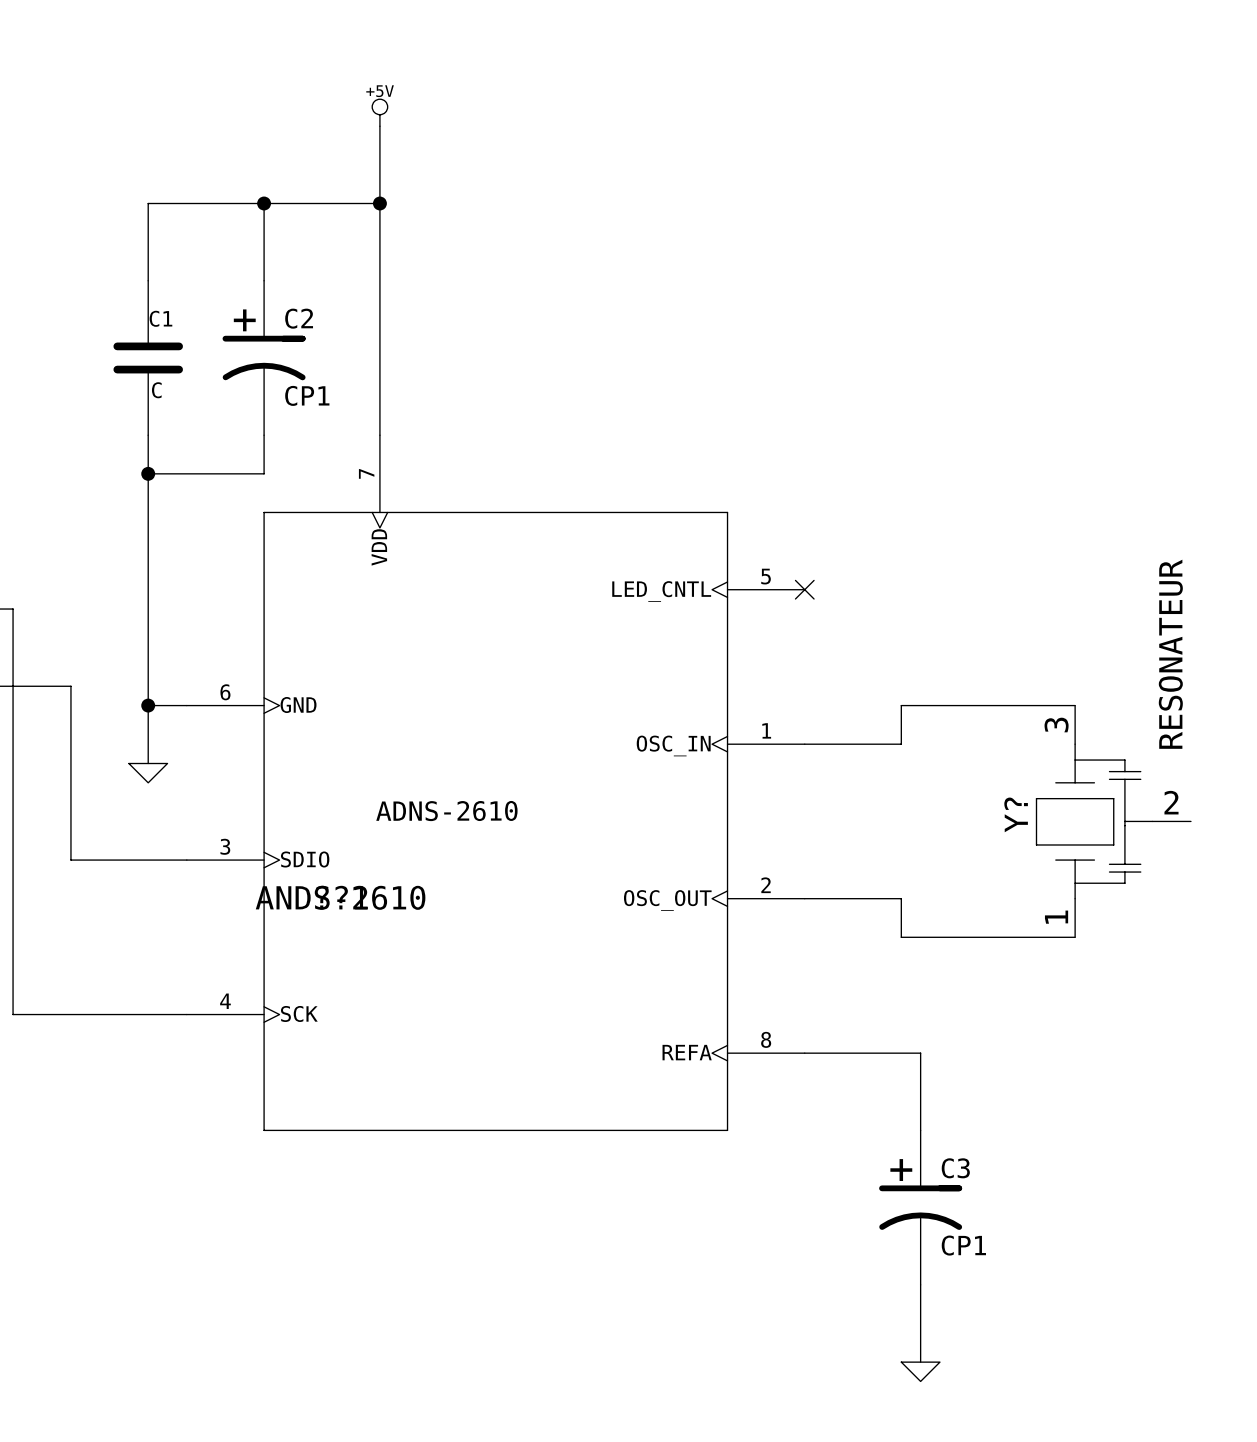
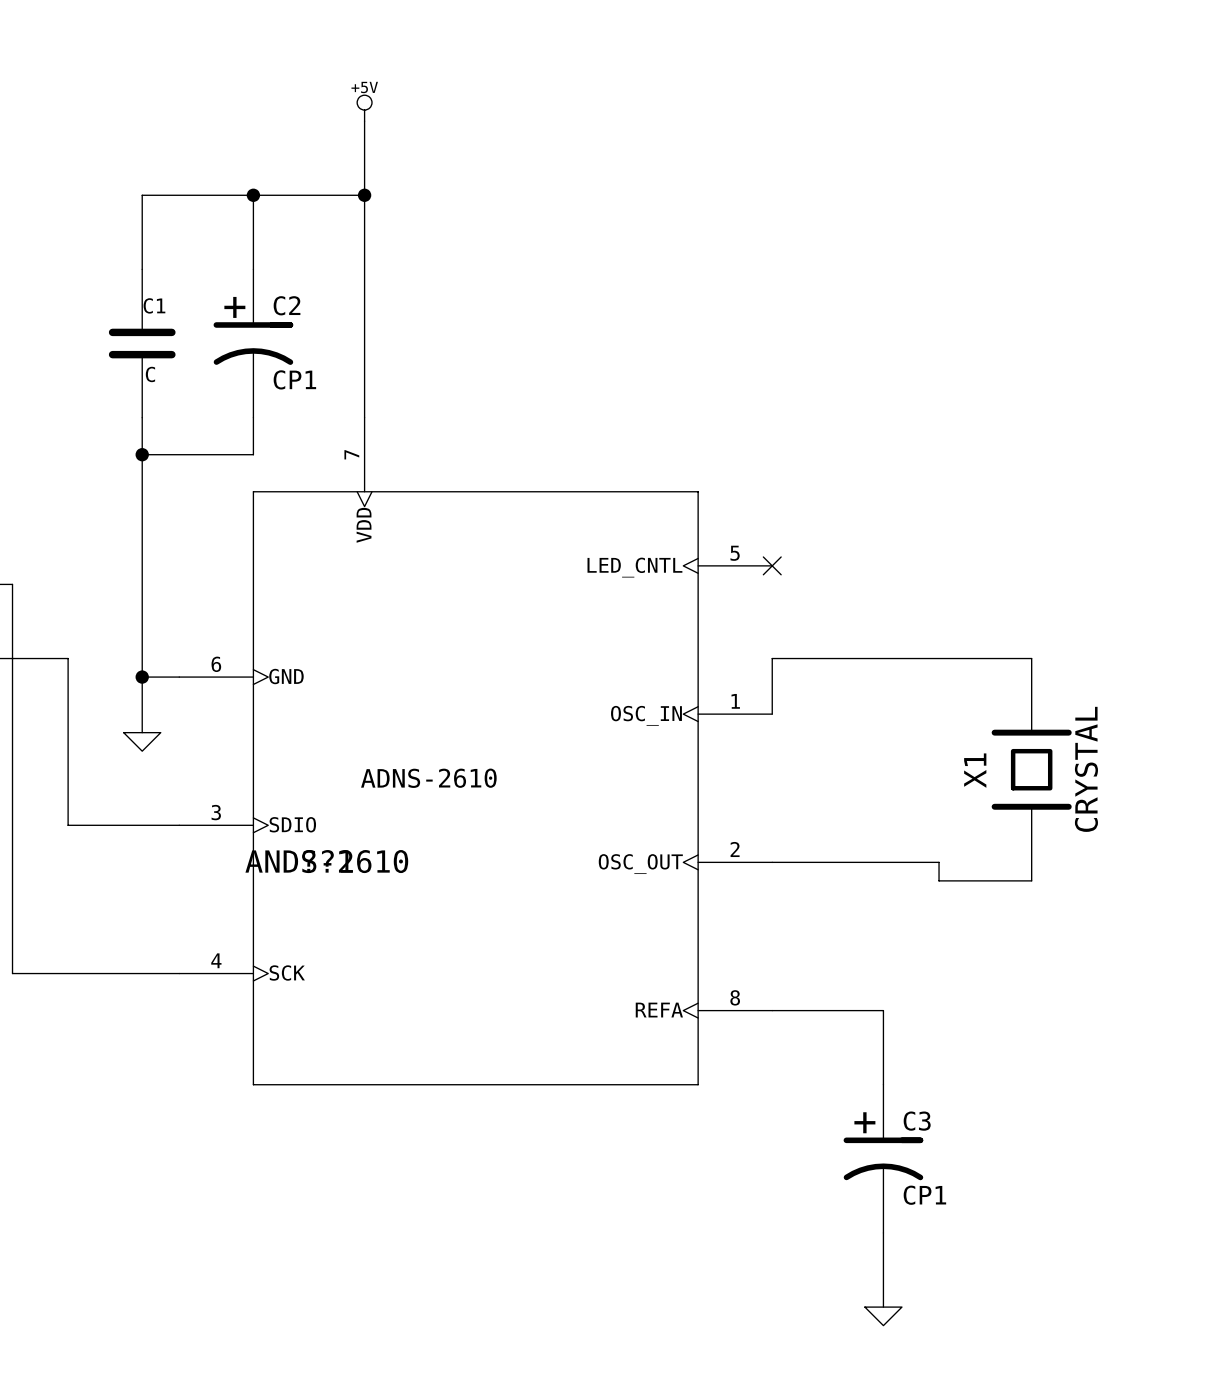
wire: (1075, 705) (901, 705) (901, 744) (804, 744) -> (1031, 658) (772, 658) (772, 714)
X1: none -> CRYSTAL (1031, 769)
Y?: RESONATEUR (1113, 821) -> none
wire: (901, 898) (901, 937) (1075, 937) -> (864, 862) (939, 862) (939, 880) (1031, 880)

